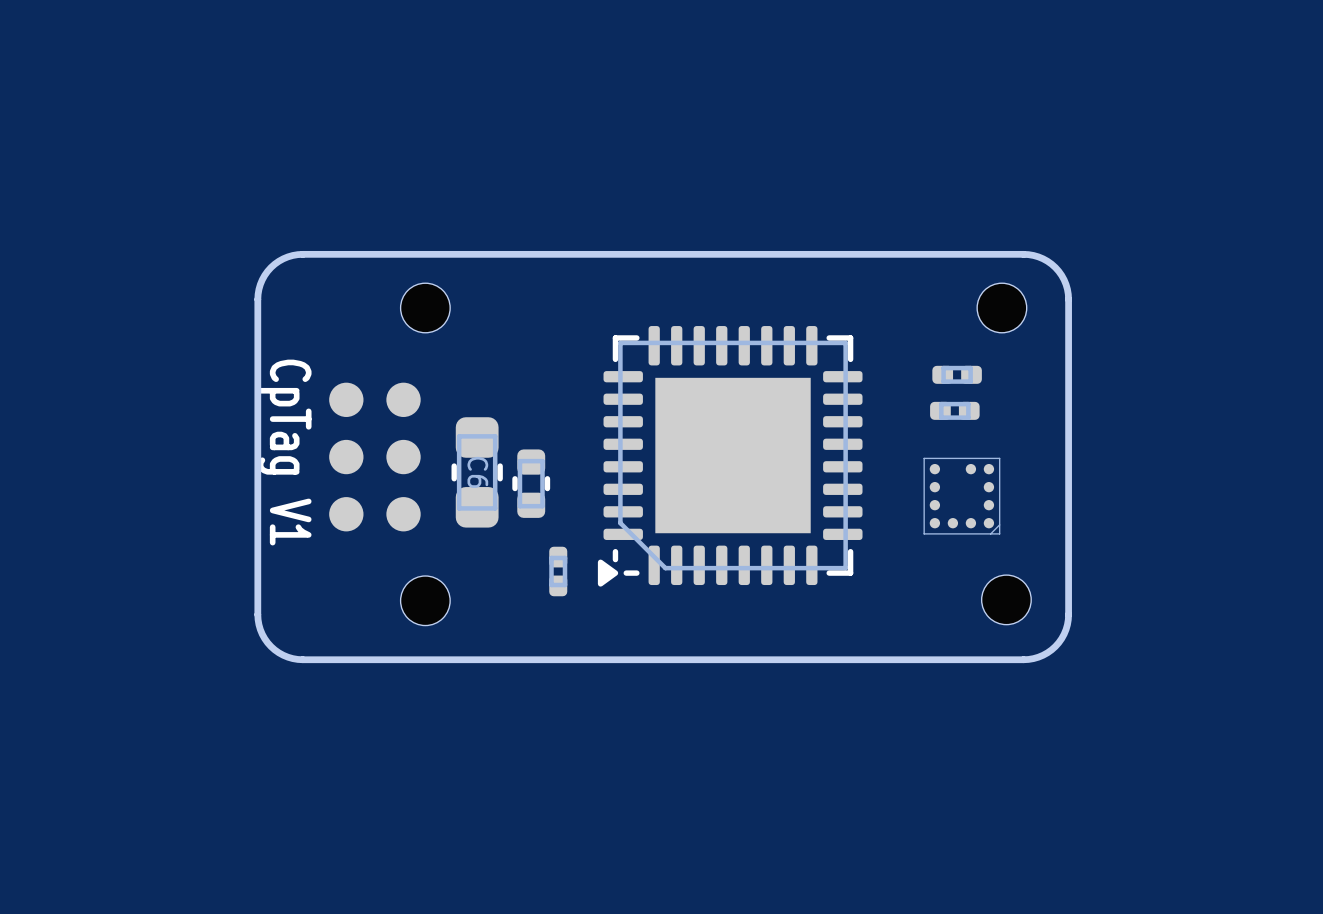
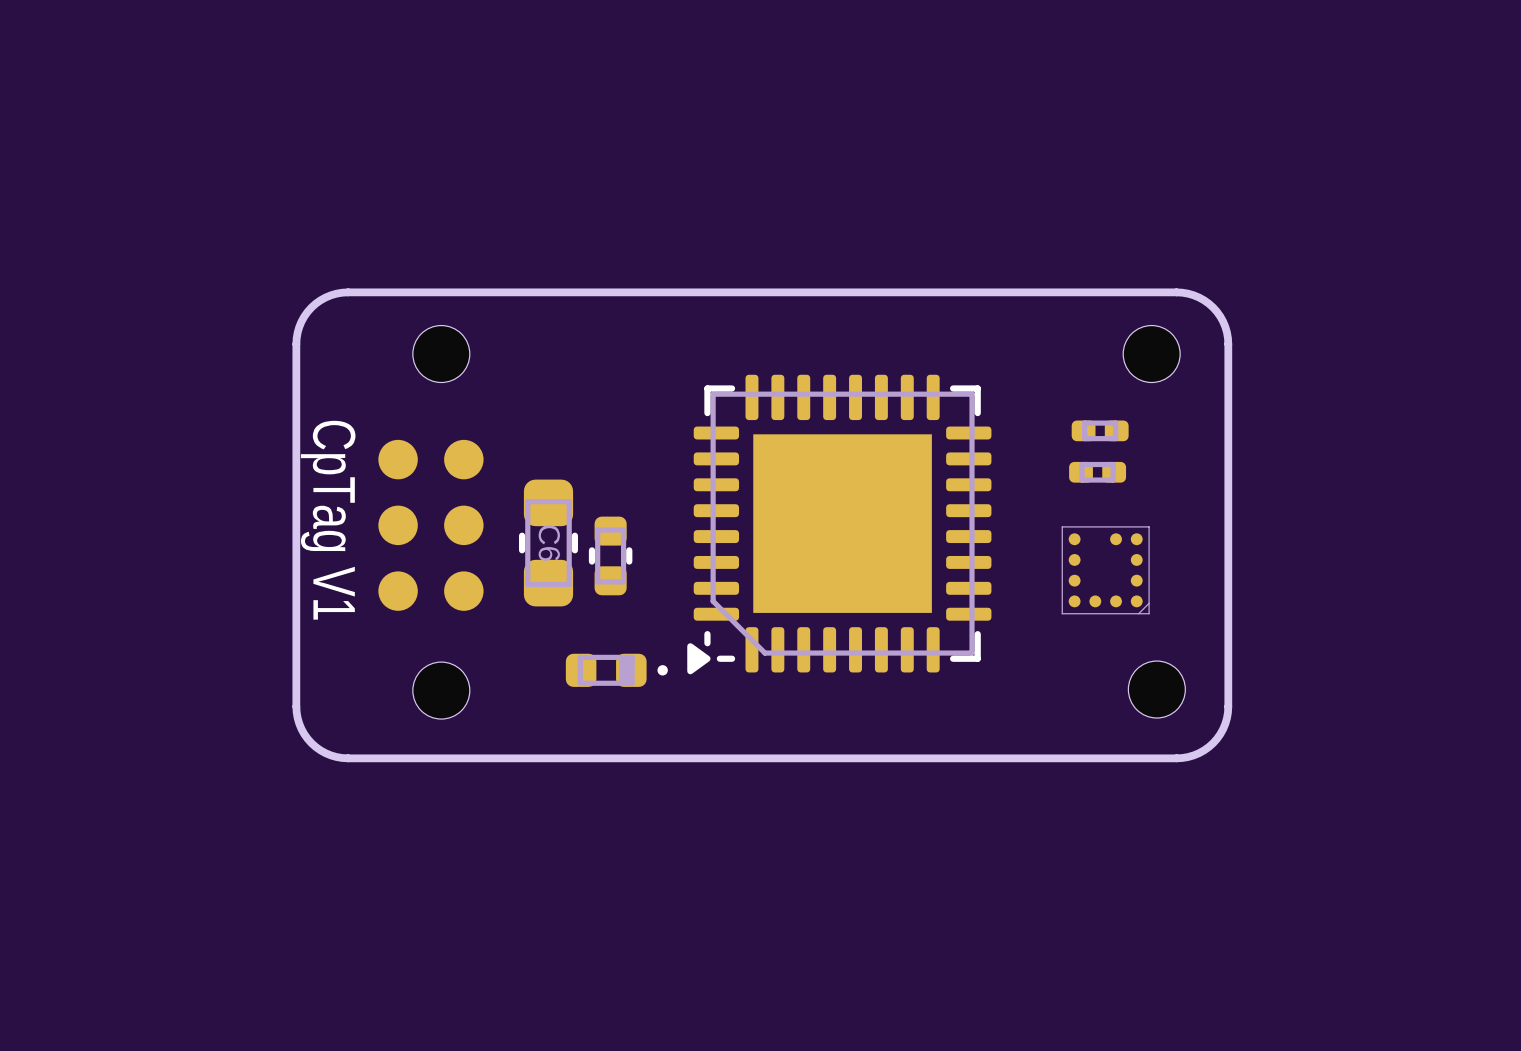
part position: (425, 307) -> (441, 354)
part footprint: [549, 546, 568, 597] -> [565, 653, 668, 687]
part position: (425, 600) -> (441, 690)

